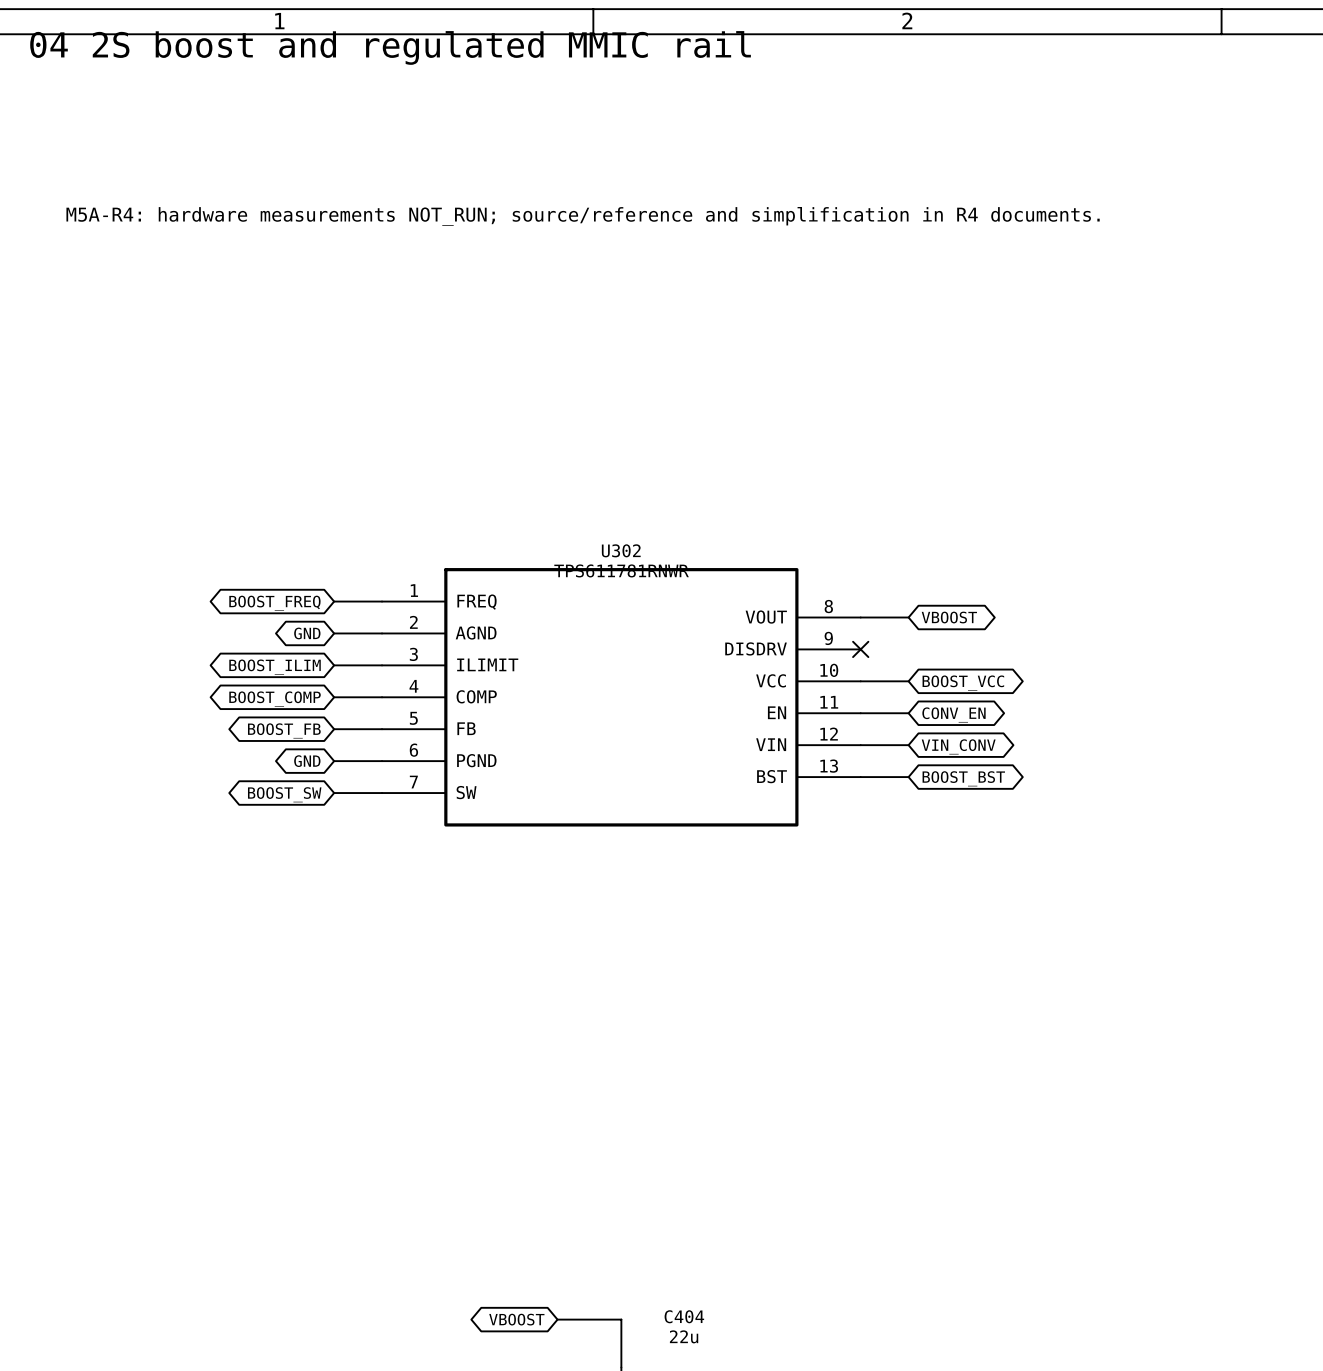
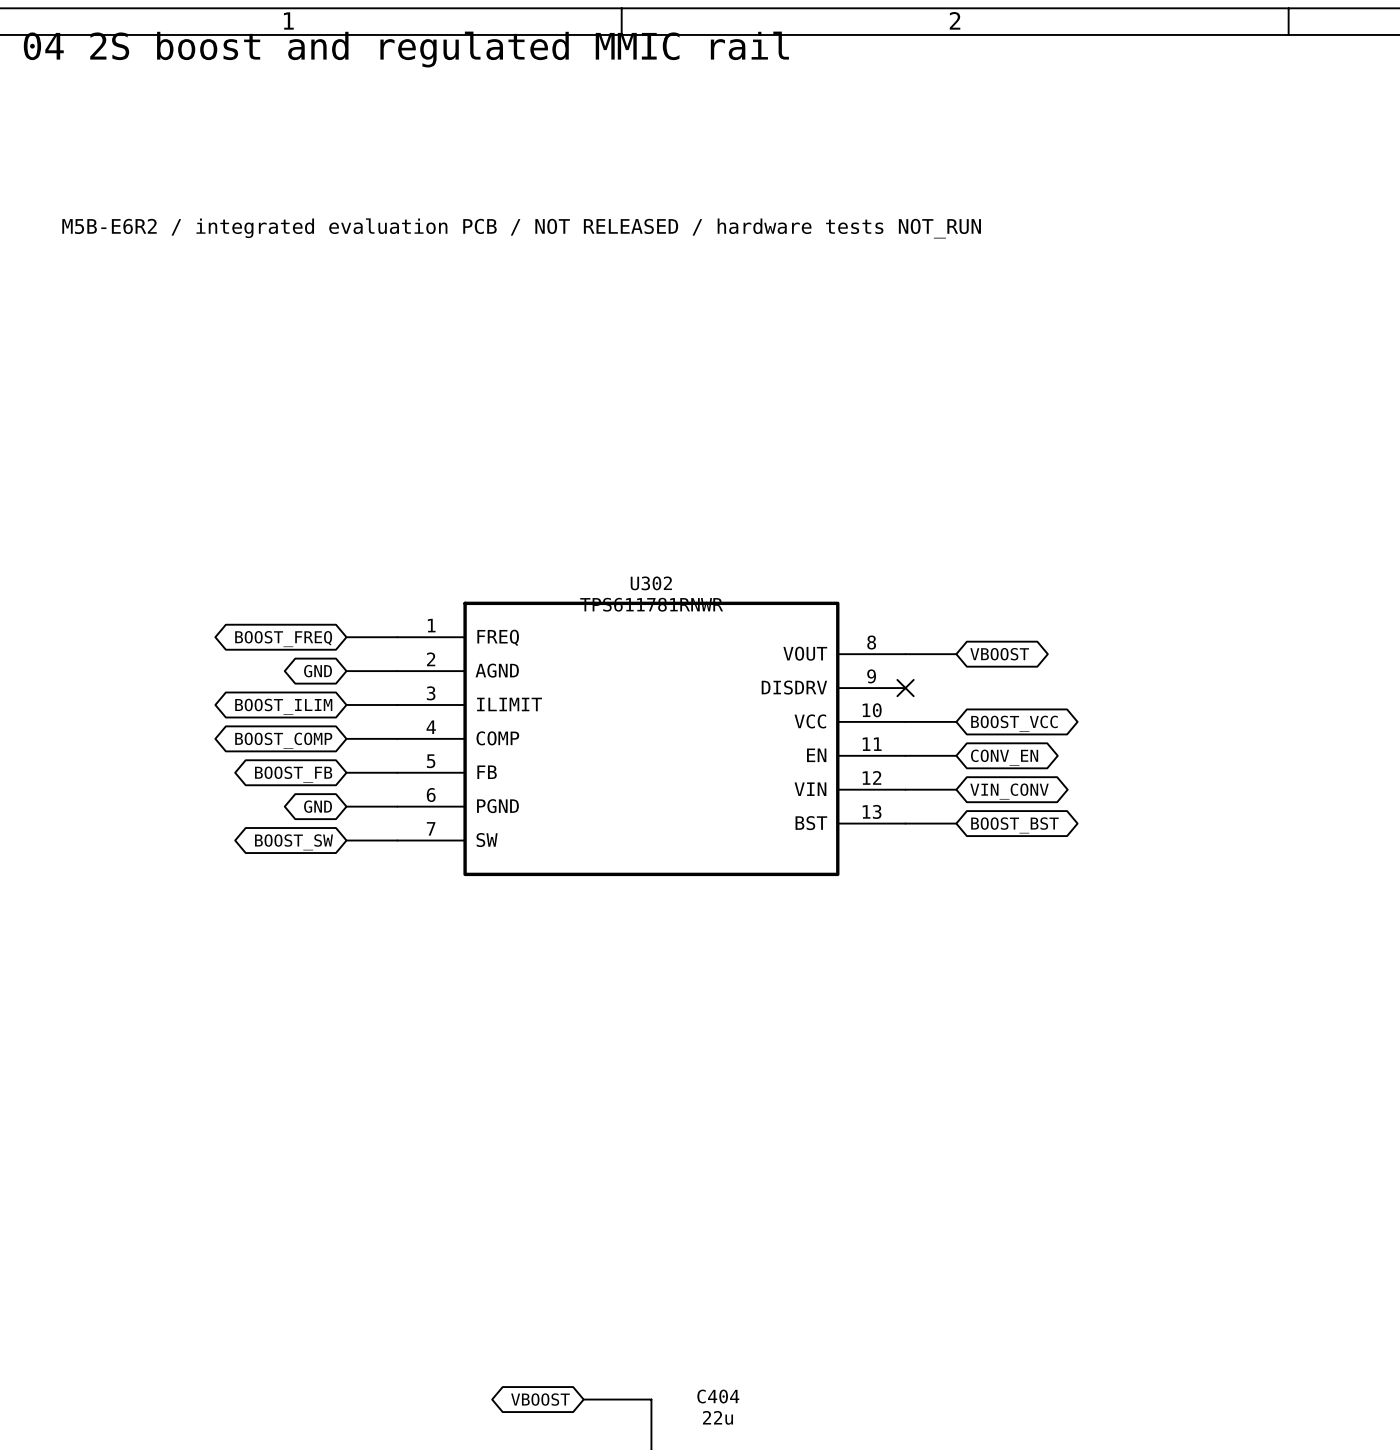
text: M5A-R4: hardware measurements NOT_RUN; source/reference and simplification in R4 documents. (583, 216) -> M5B-E6R2 / integrated evaluation PCB / NOT RELEASED / hardware tests NOT_RUN (521, 228)

